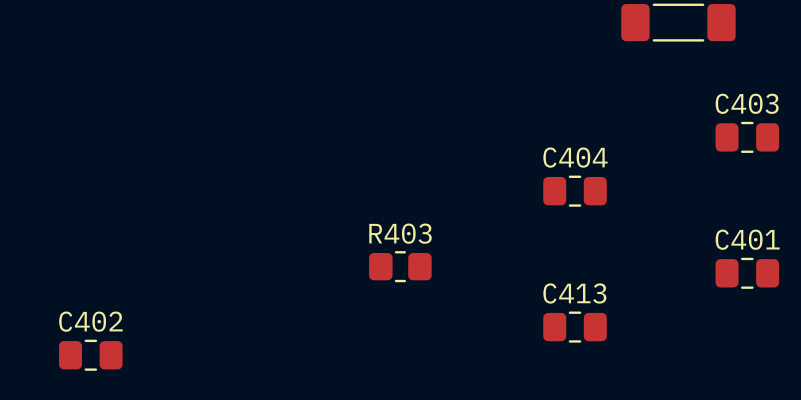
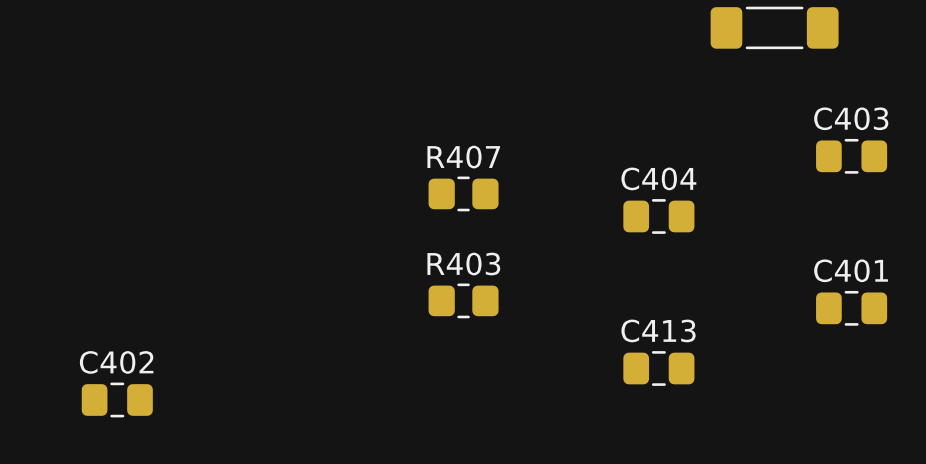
R407: none -> (463, 193)

